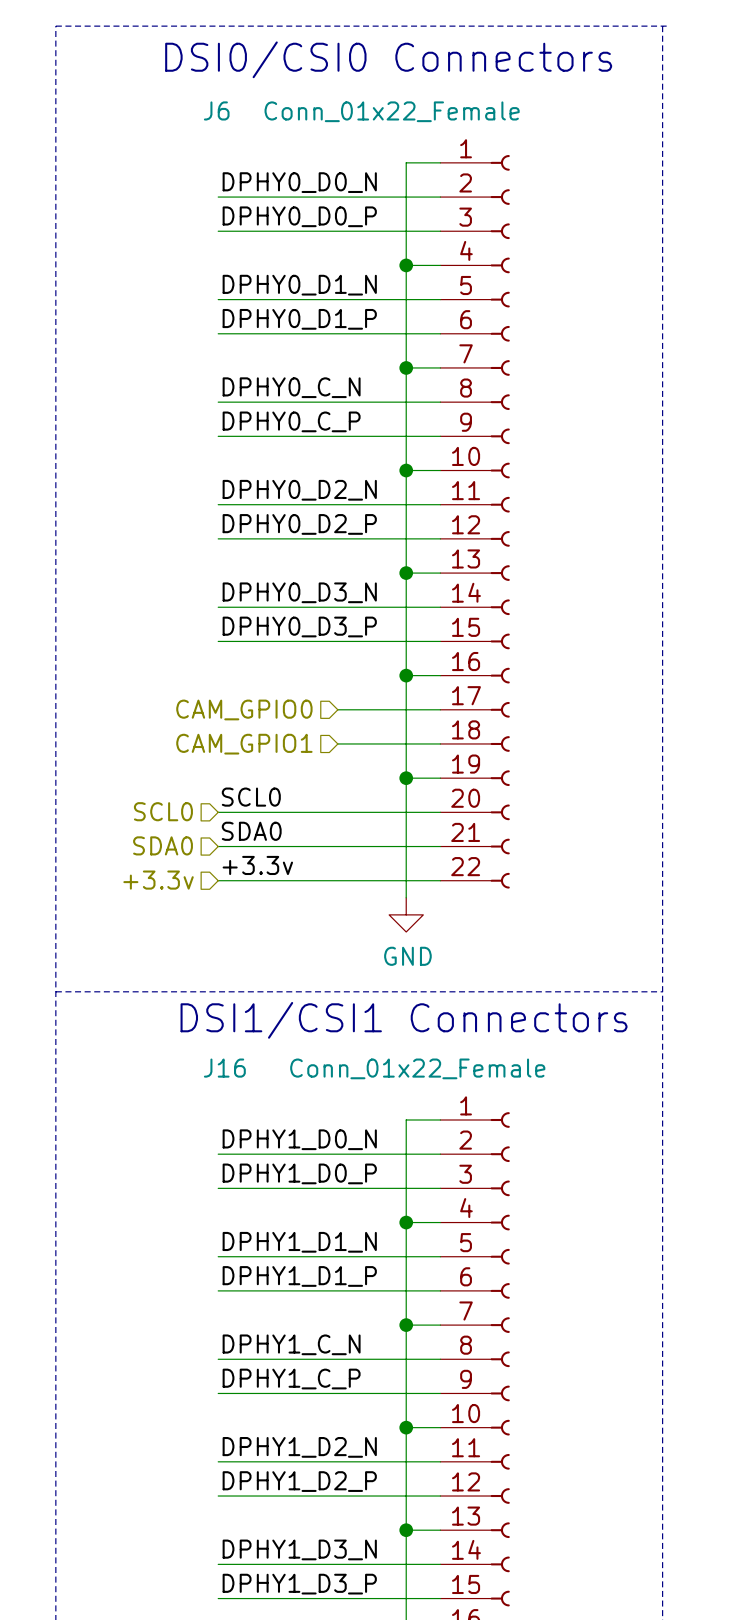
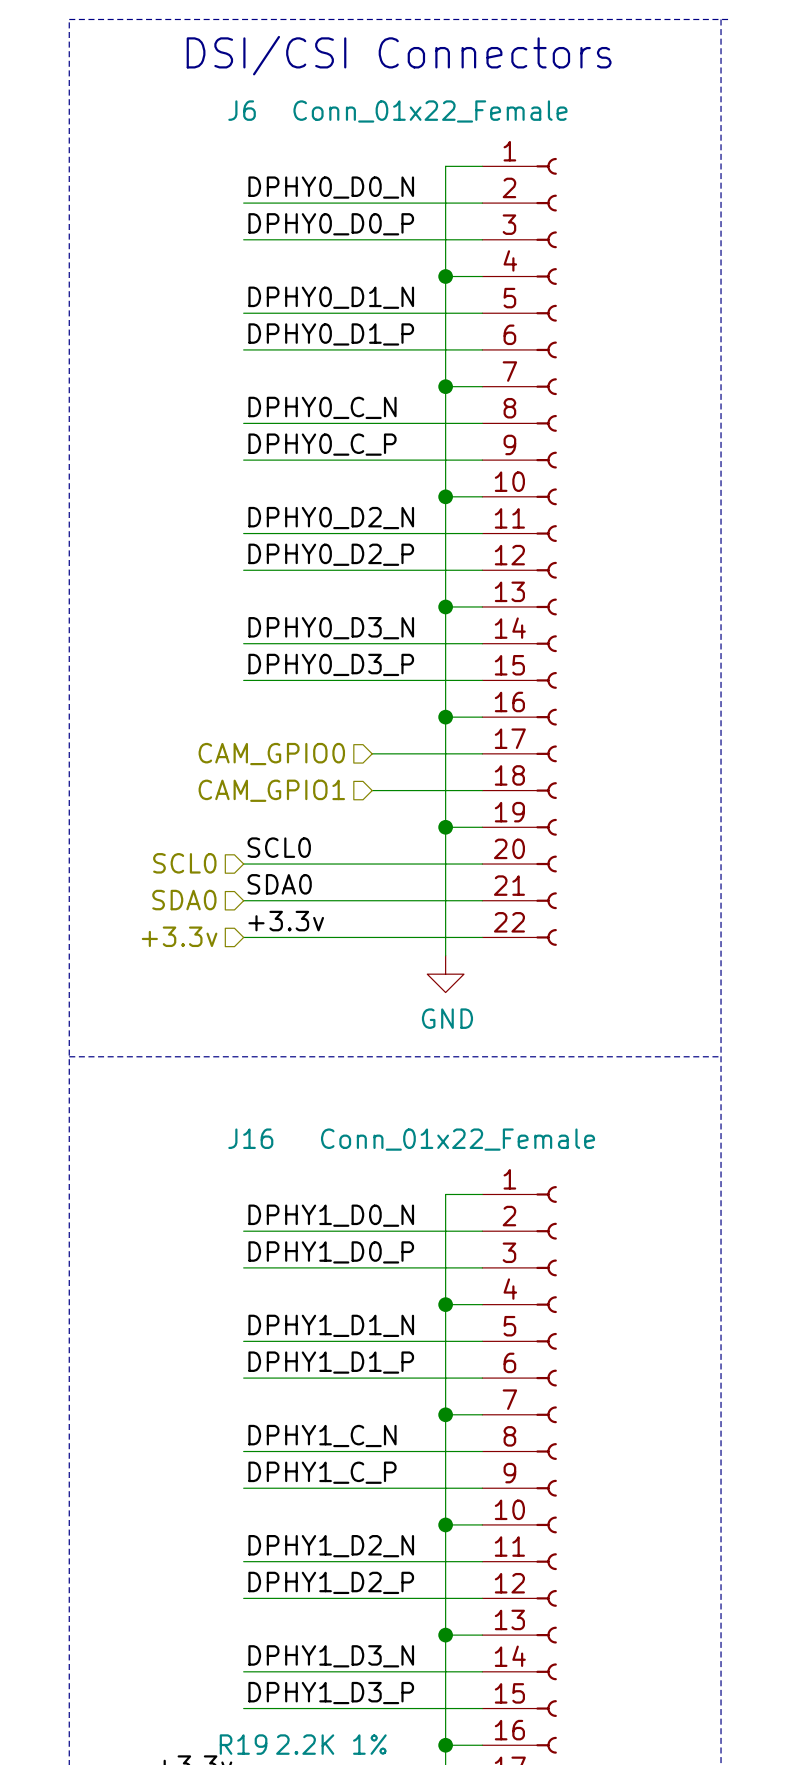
text: DSI0/CSI0 Connectors (388, 59) -> DSI/CSI Connectors (399, 55)
text: DSI1/CSI1 Connectors (404, 1020) -> none

